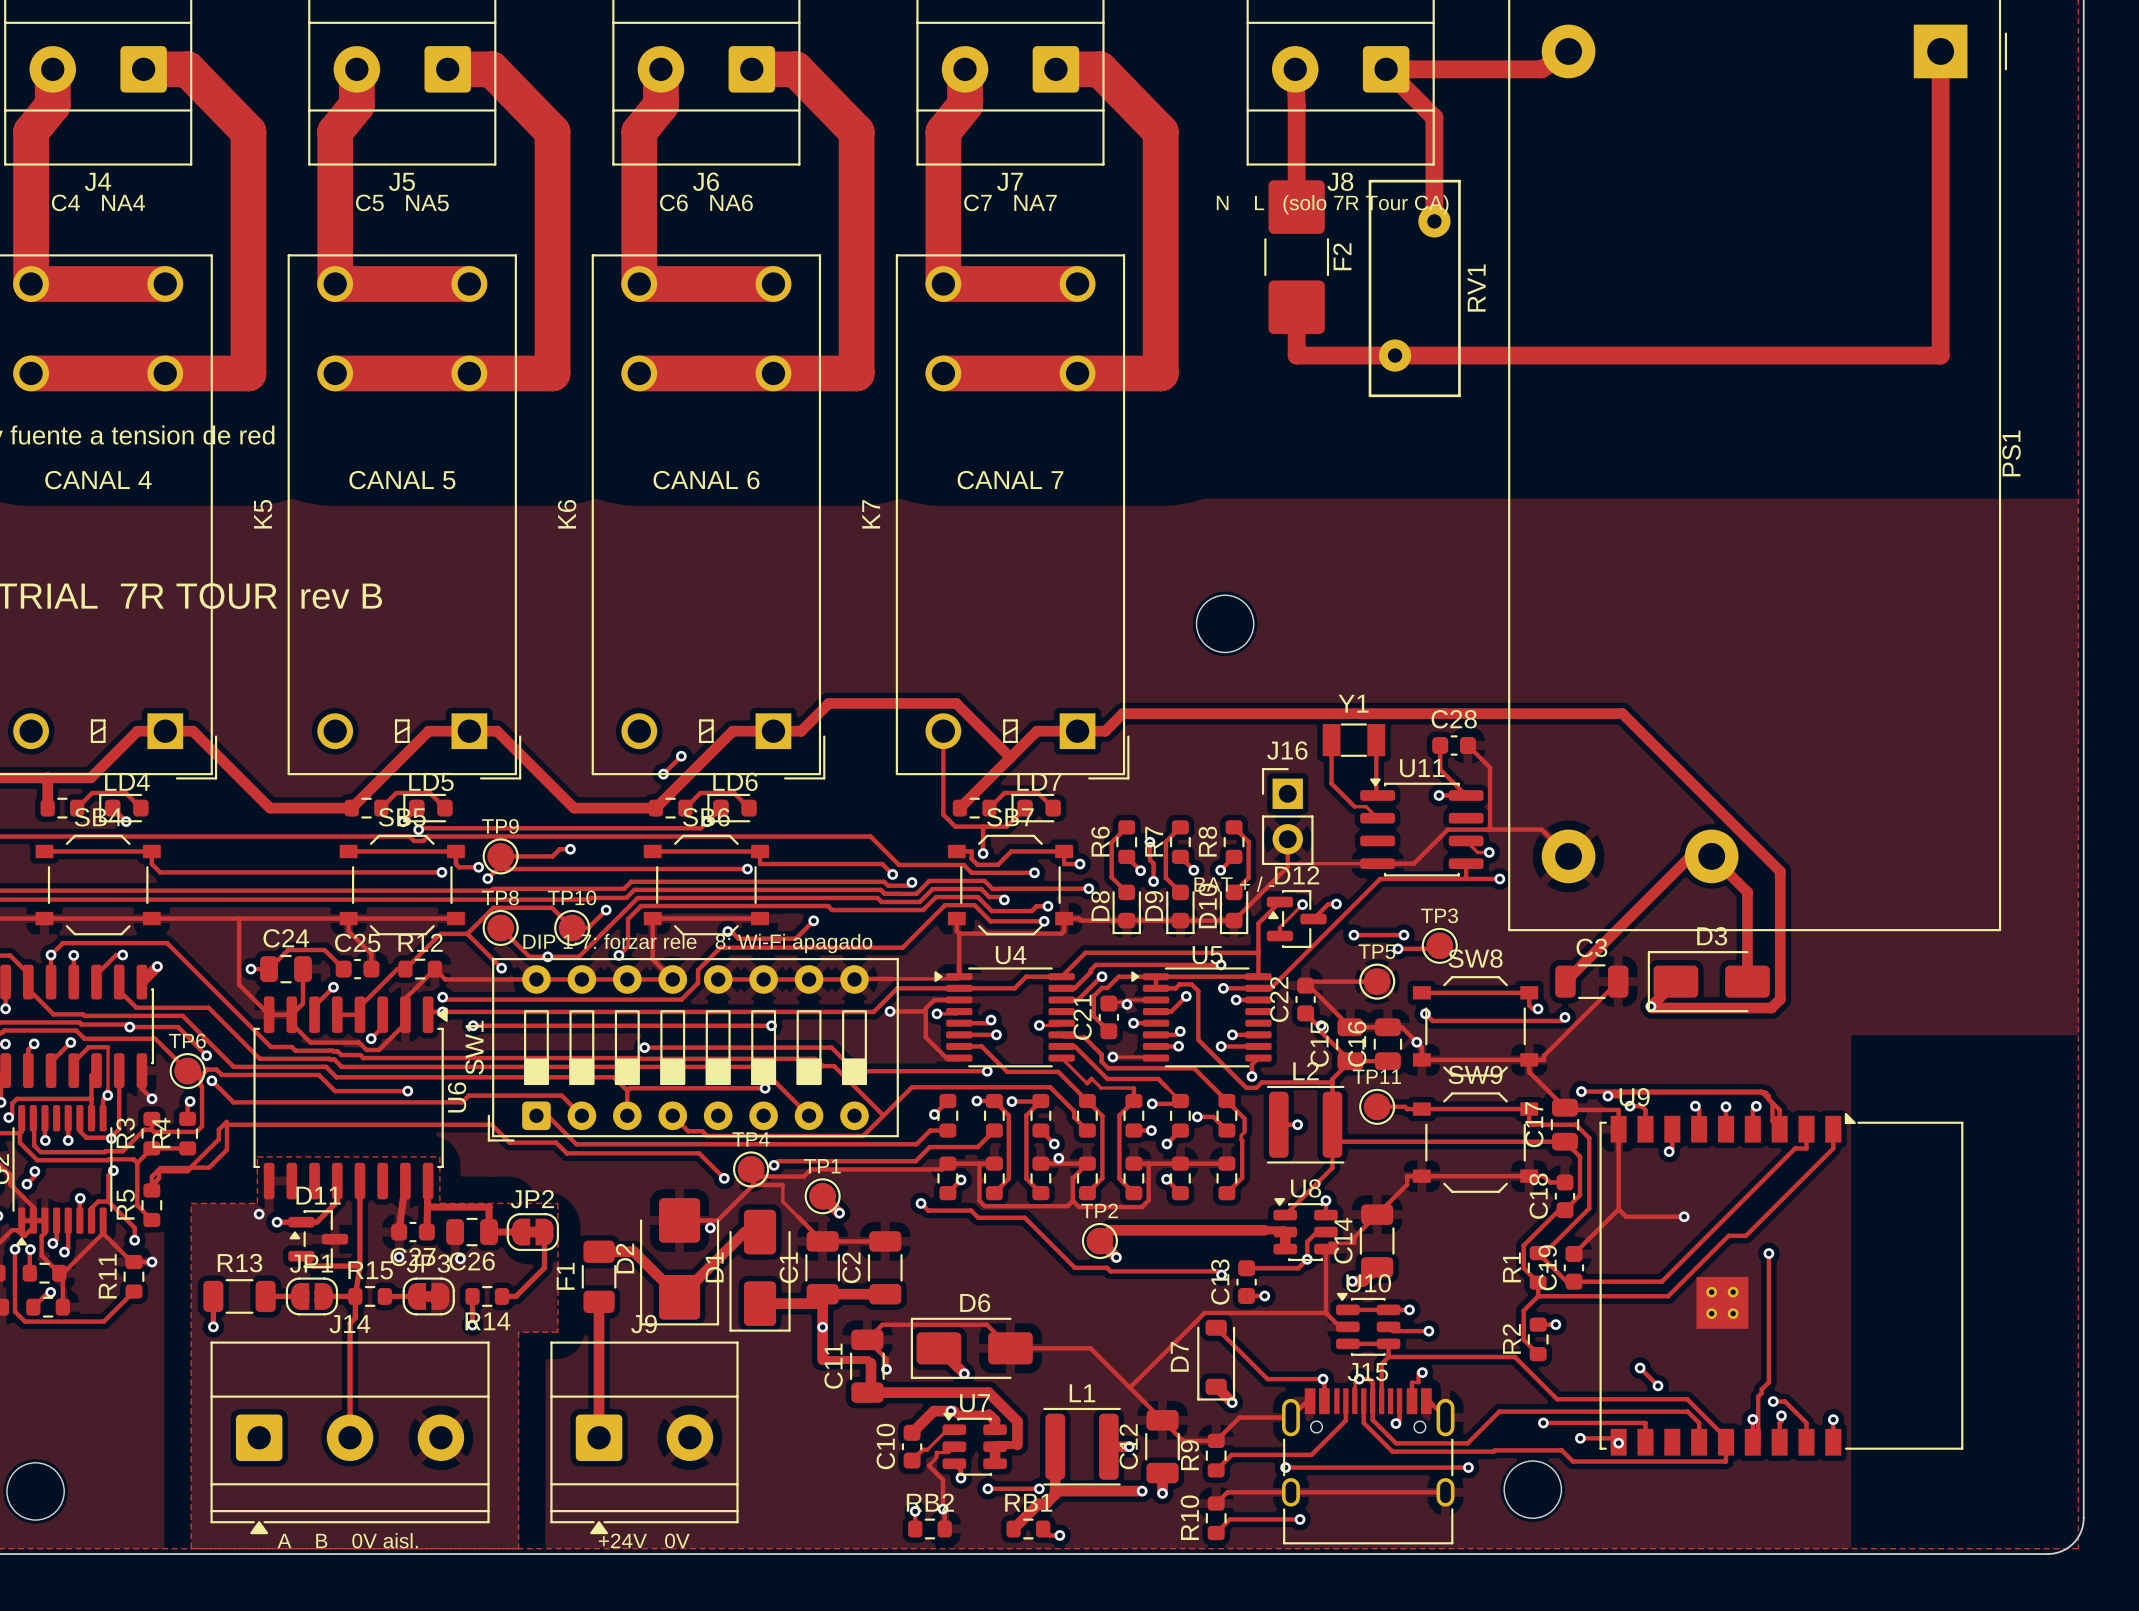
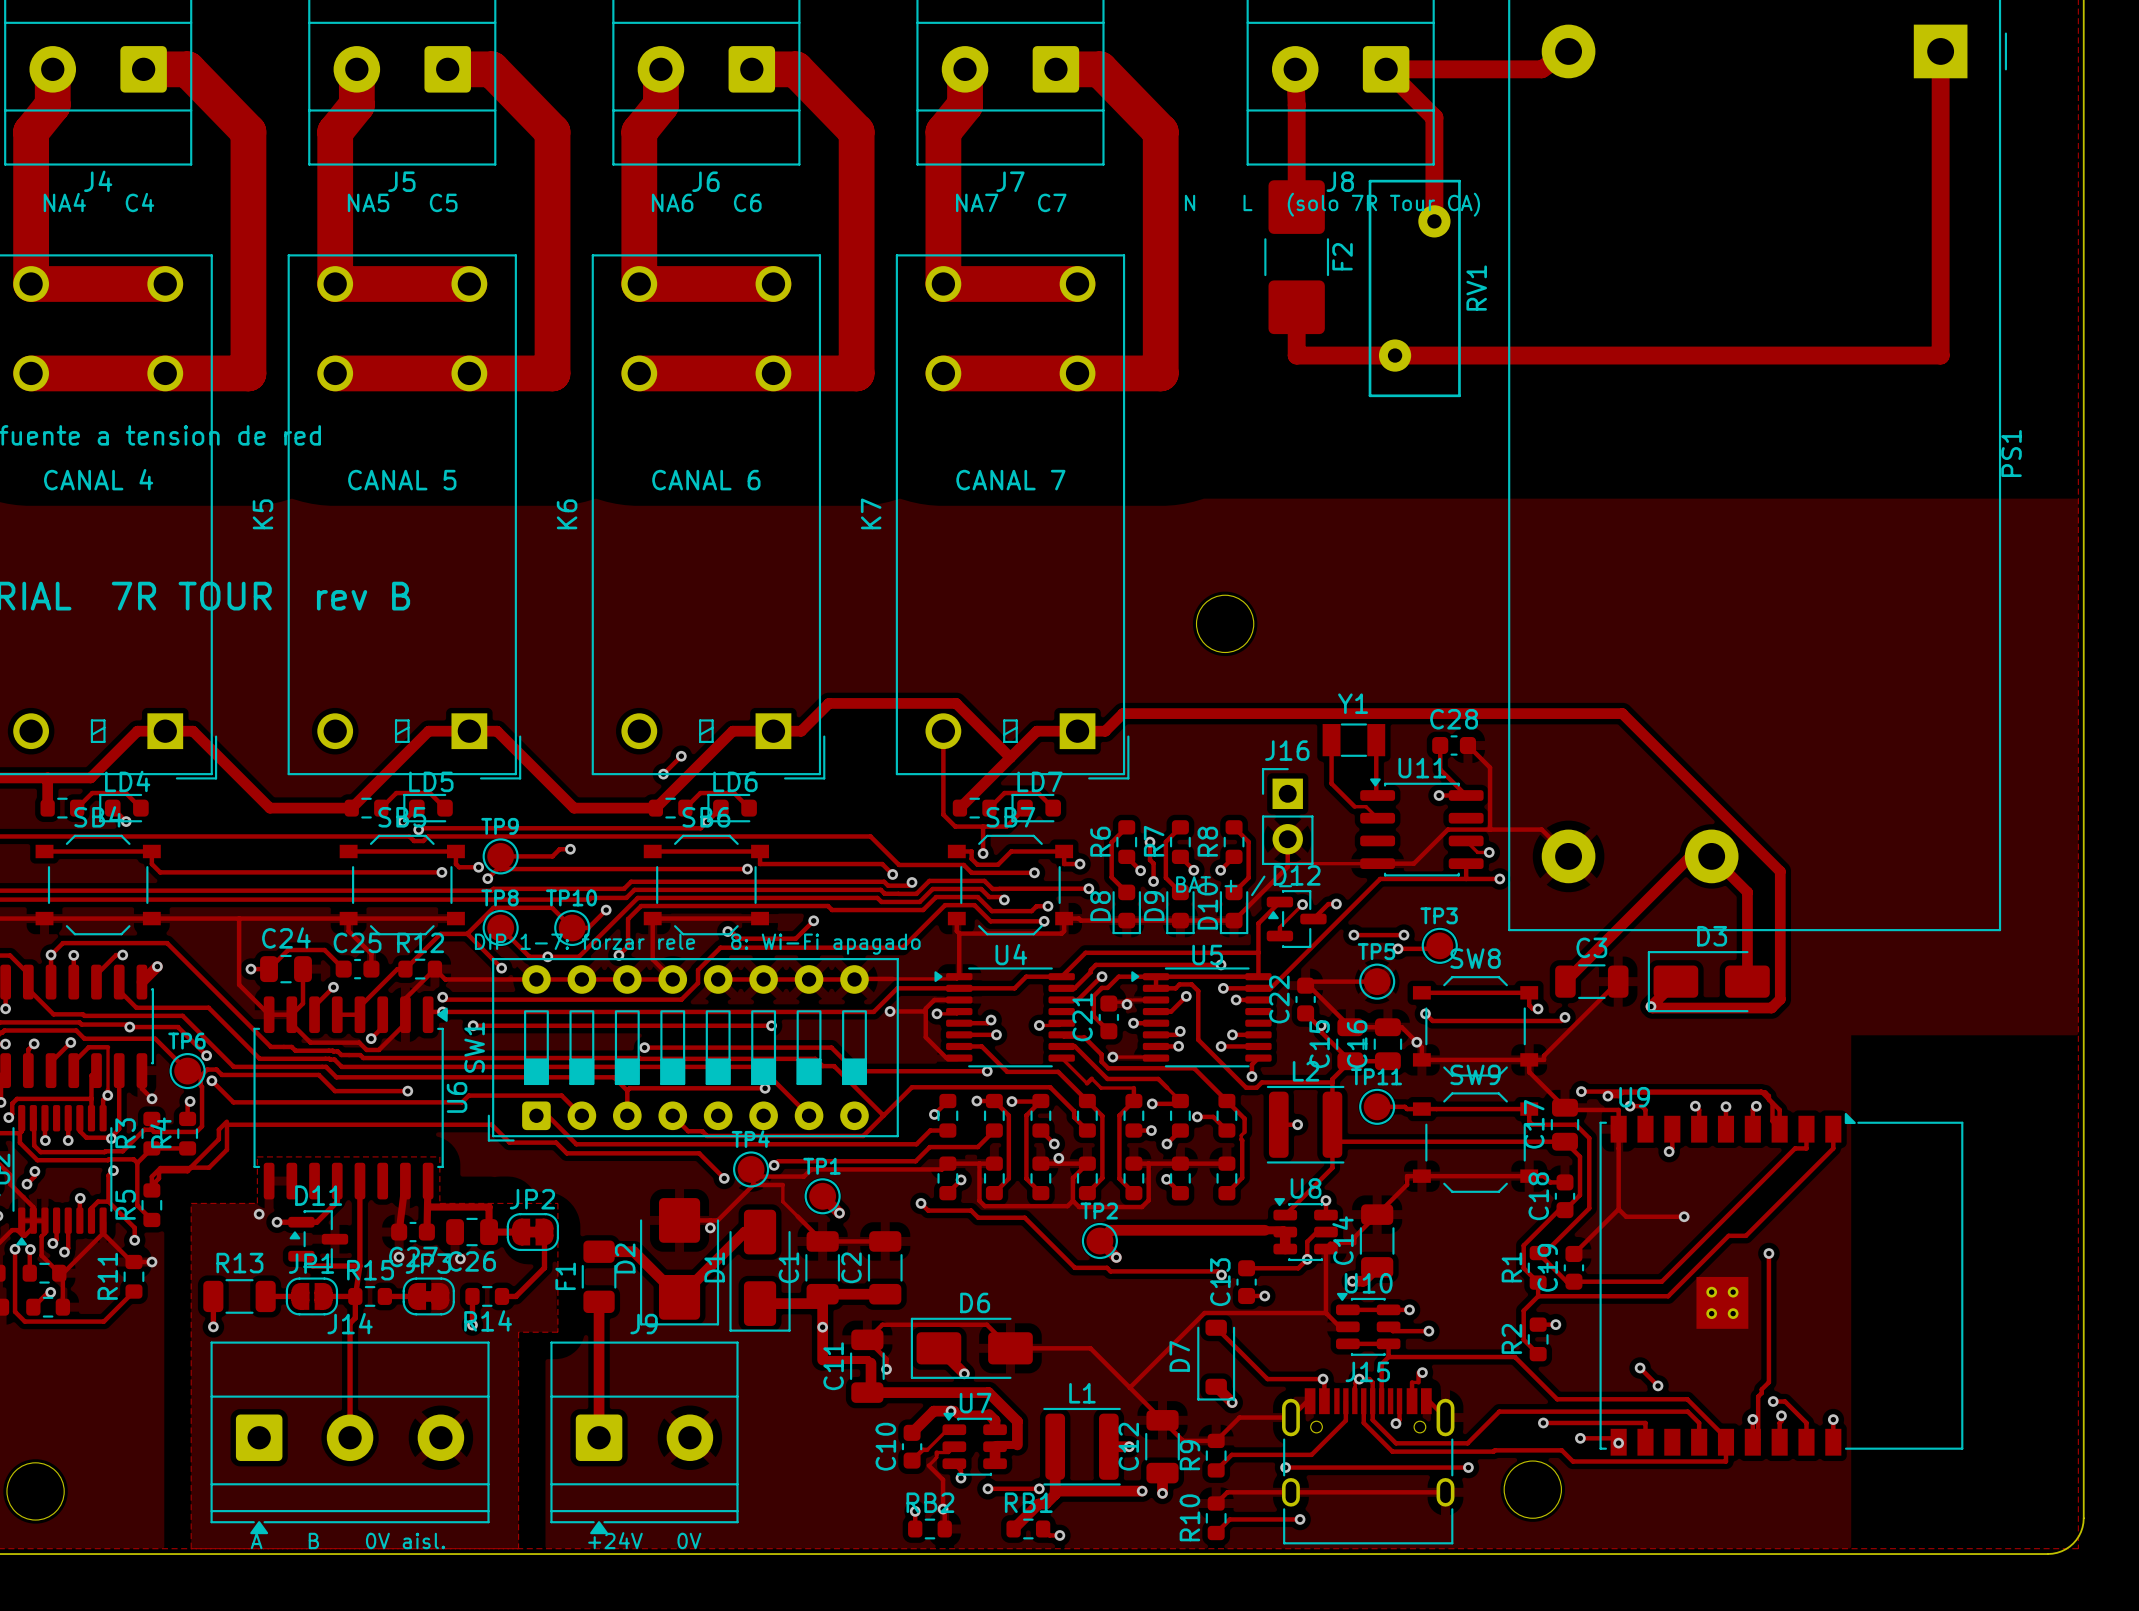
text: C4 NA4 (98, 202) -> NA4 C4 (98, 202)
text: C5 NA5 (402, 202) -> NA5 C5 (402, 202)
text: C6 NA6 (706, 202) -> NA6 C6 (706, 202)
text: C7 NA7 (1010, 202) -> NA7 C7 (1011, 202)

